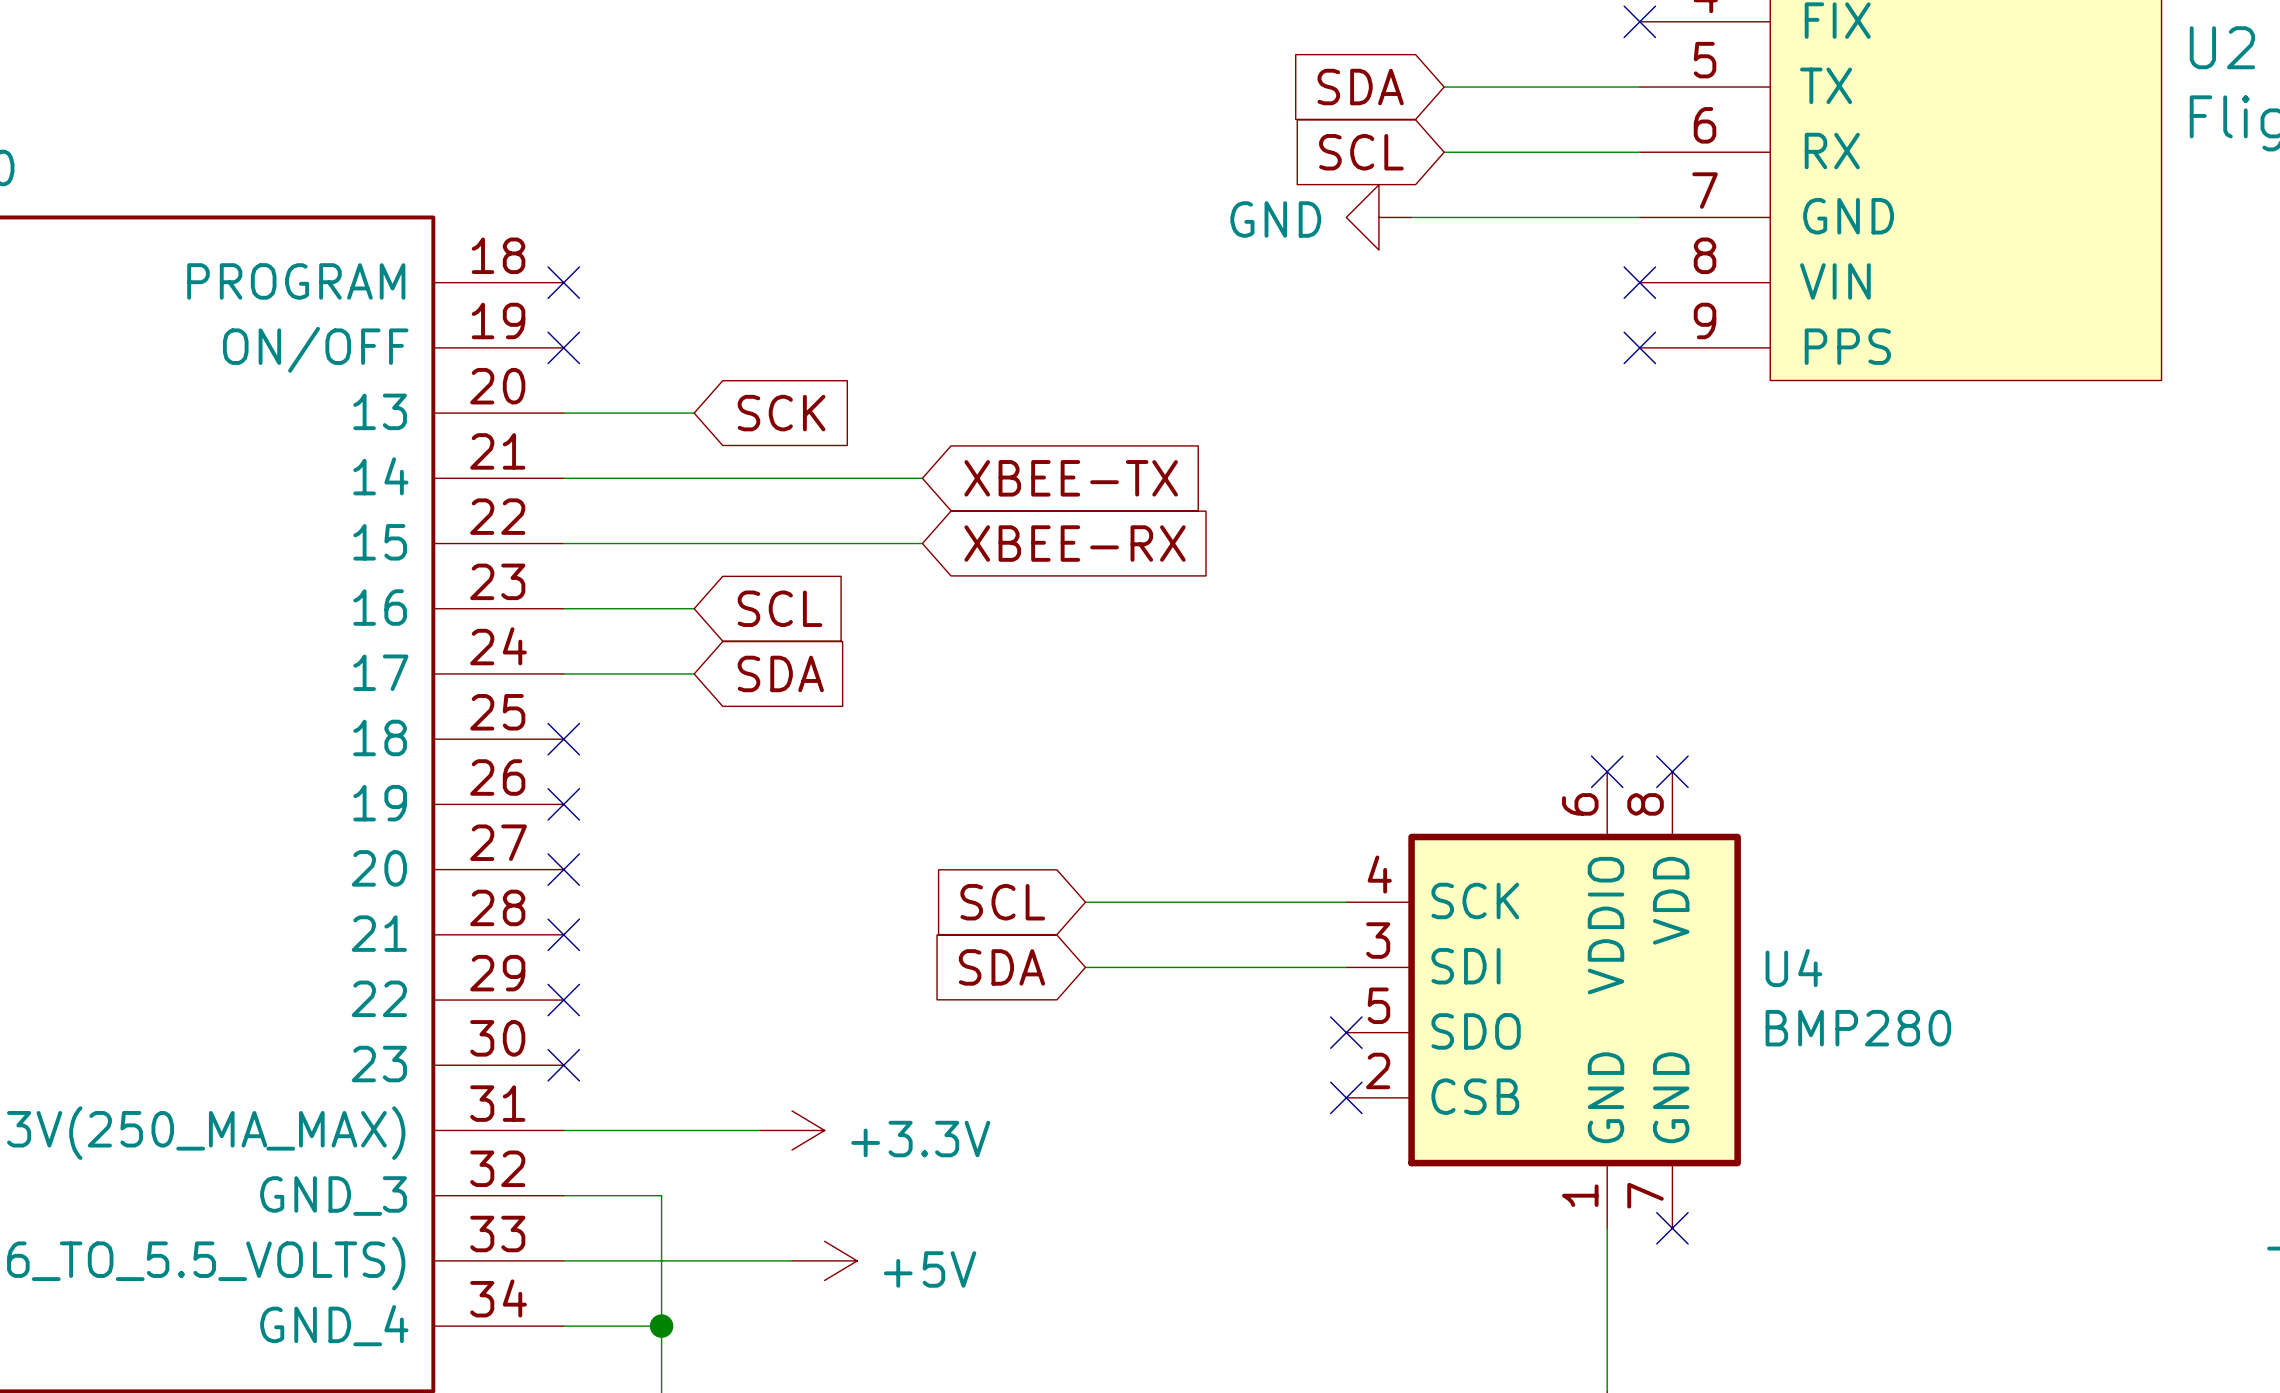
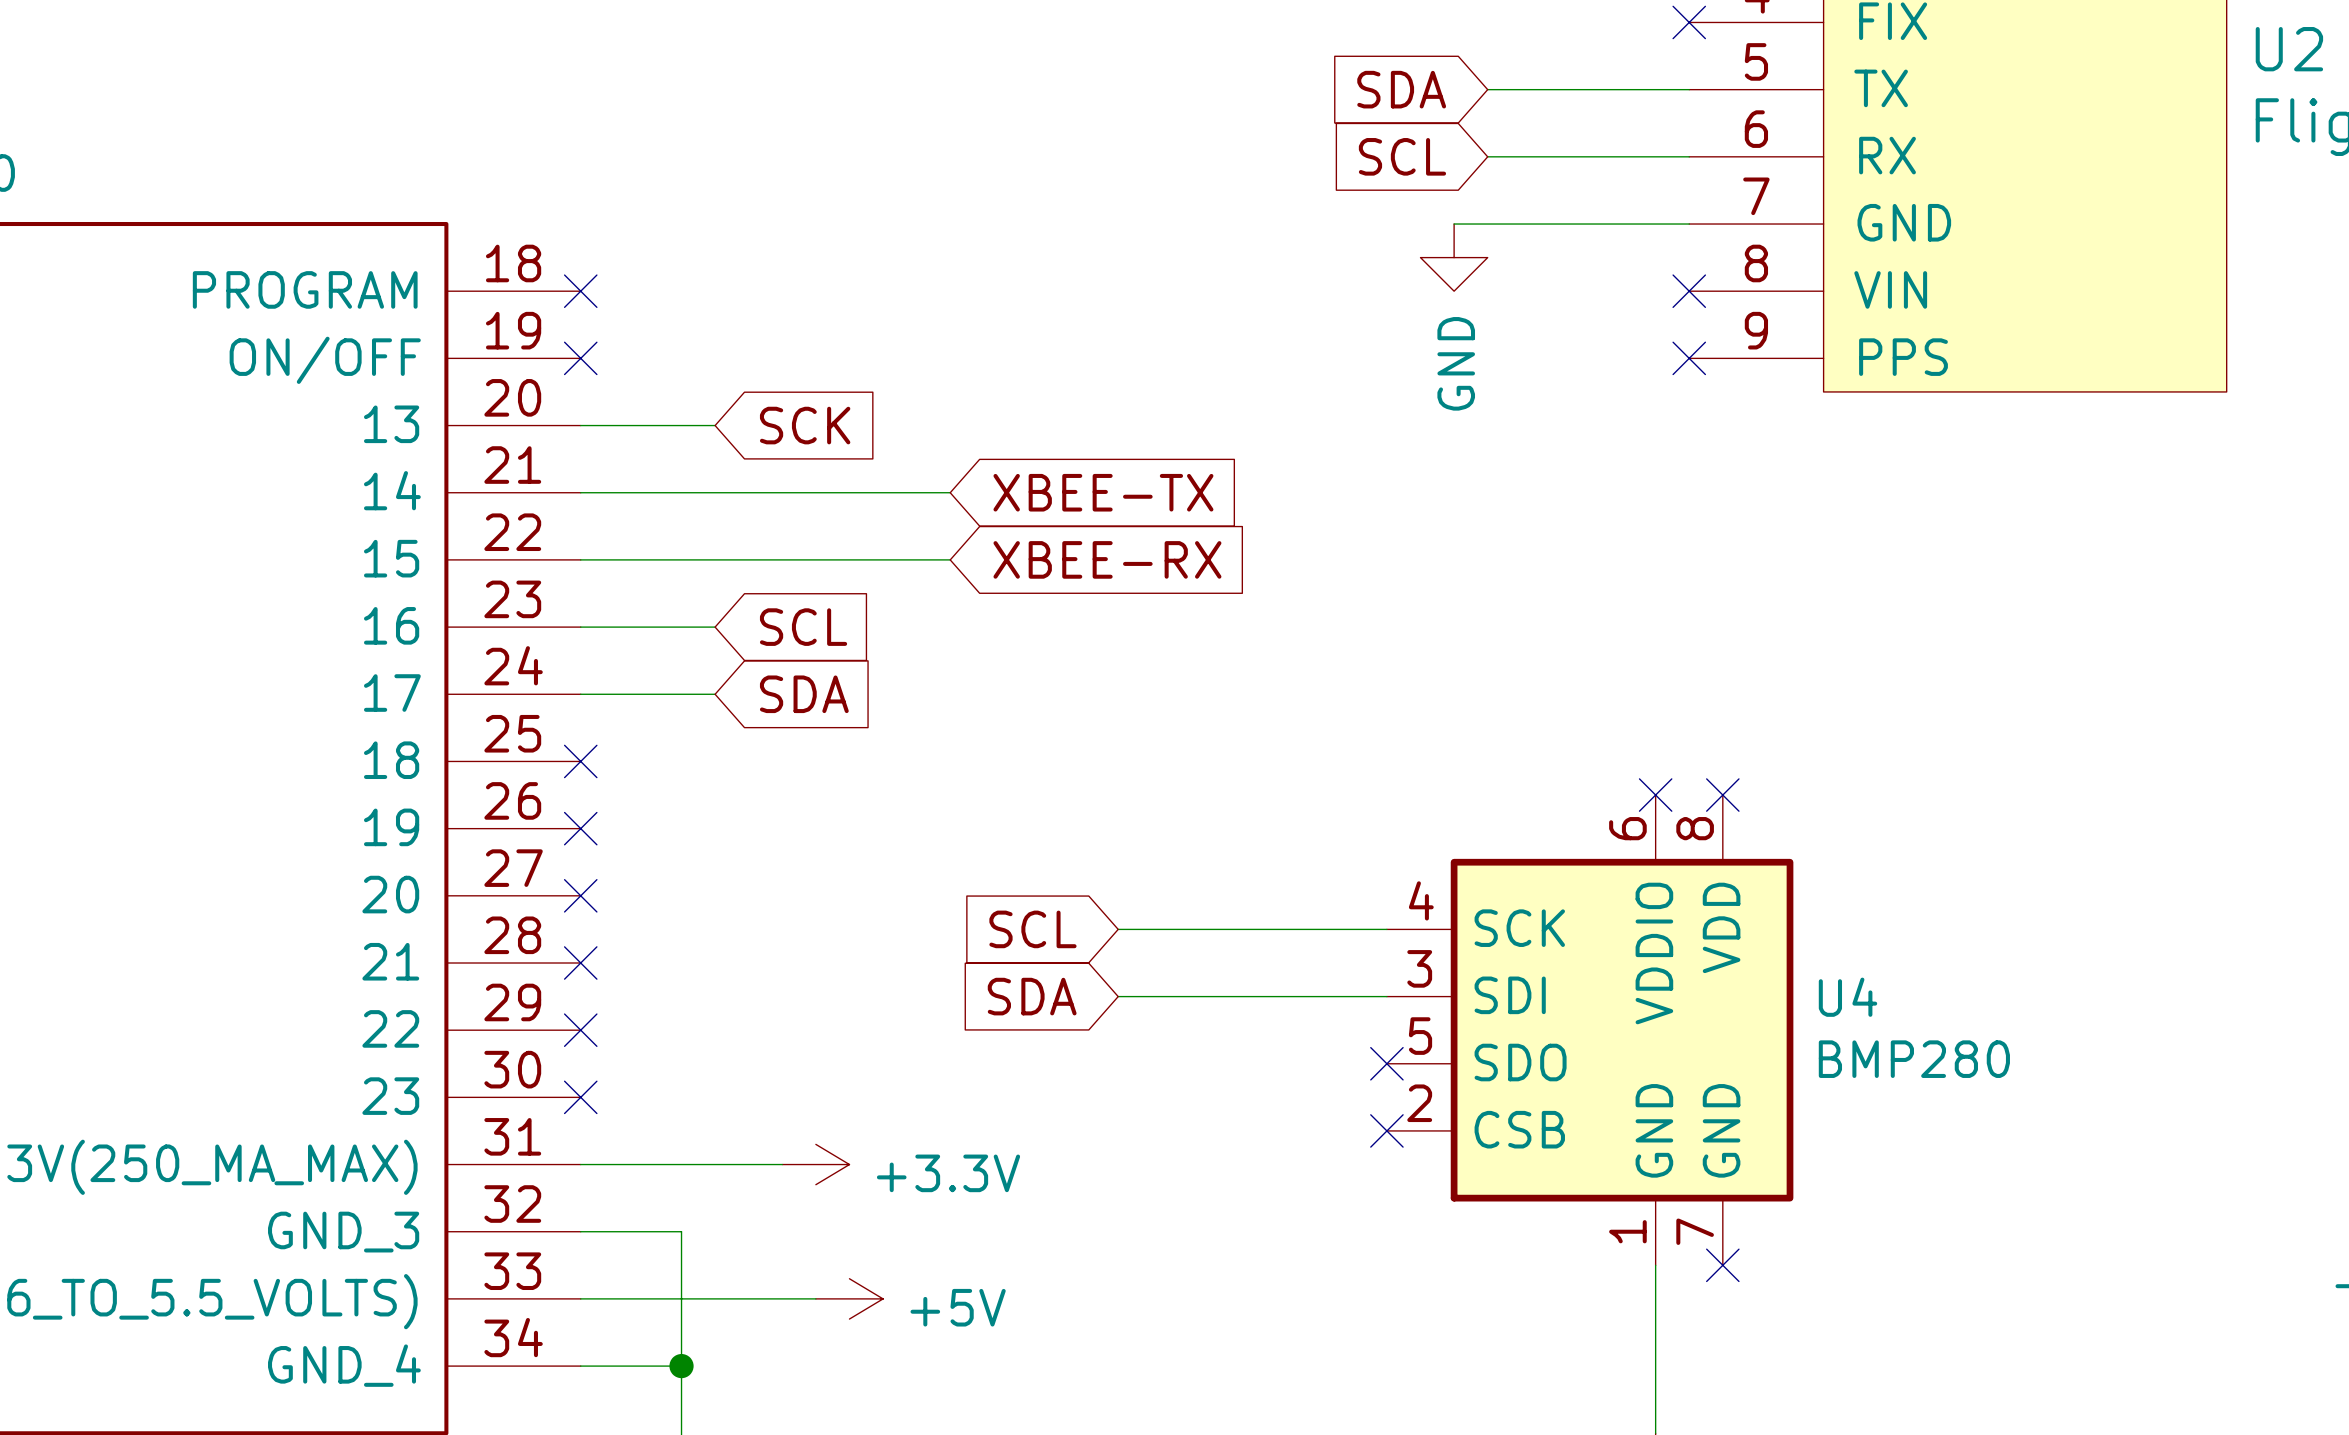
power symbol rotation: 0° (1378, 217) -> 90° counterclockwise (1454, 257)
power symbol position: GND (1378, 217) -> GND (1454, 257)

